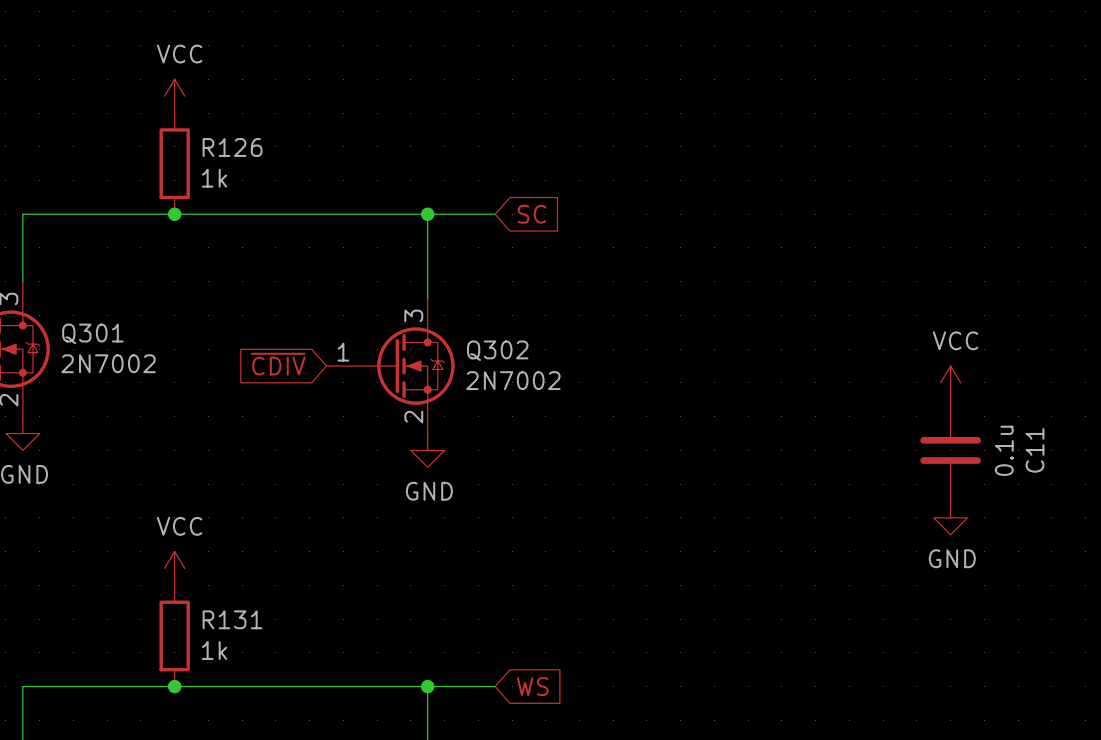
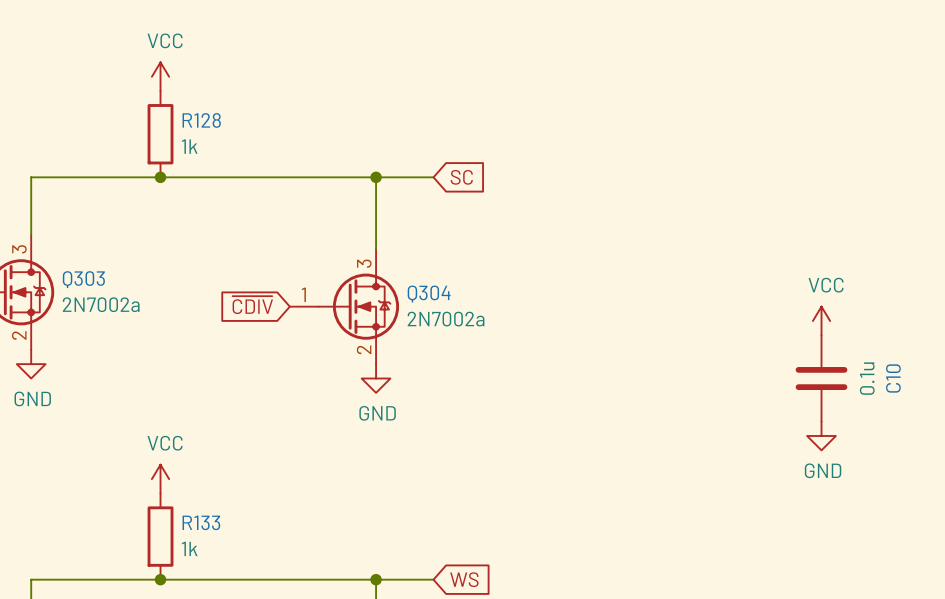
R126 name: R126 (232, 147) -> R128 (201, 120)
Q301 name: Q301 (92, 333) -> Q303 (83, 279)
Q302 name: Q302 (497, 350) -> Q304 (429, 293)
Q301 value: 2N7002 (108, 363) -> 2N7002a (101, 304)
Q302 value: 2N7002 (513, 380) -> 2N7002a (446, 319)
C11 name: C11 (1035, 450) -> C10 (893, 378)
R131 name: R131 (232, 619) -> R133 (201, 522)

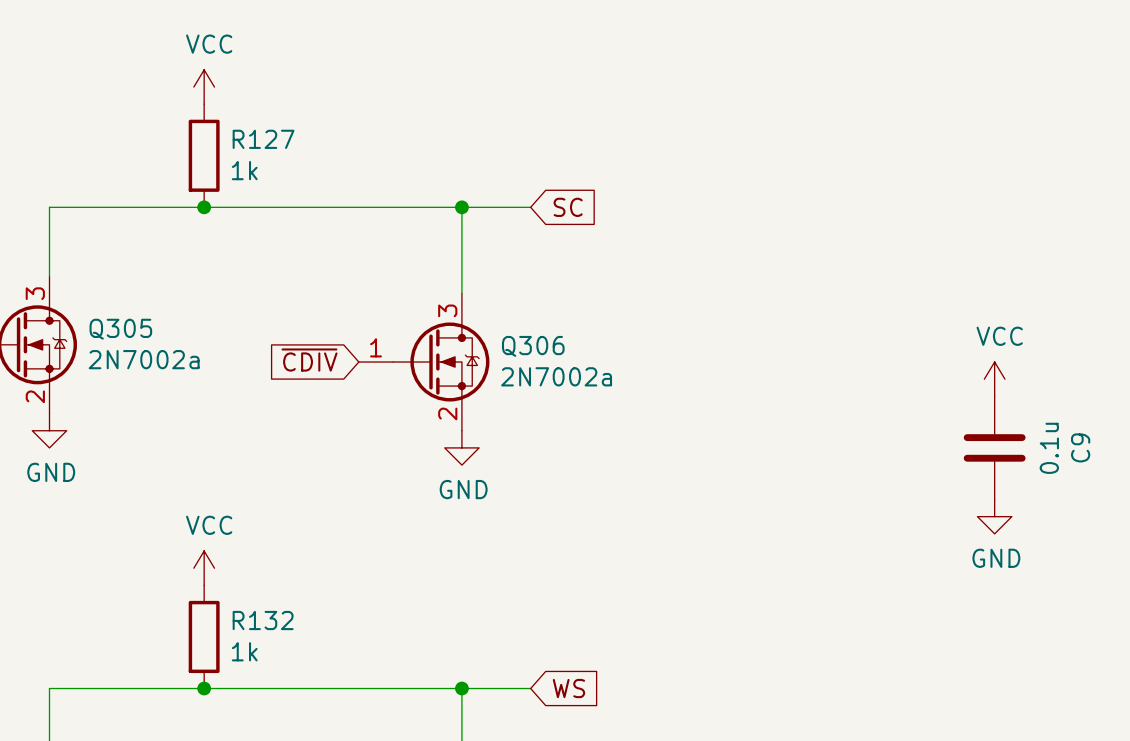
R128 name: R128 (201, 120) -> R127 (263, 139)
Q303 name: Q303 (83, 279) -> Q305 (120, 329)
Q304 name: Q304 (429, 293) -> Q306 (533, 346)
C10 name: C10 (893, 378) -> C9 (1080, 447)
R133 name: R133 (201, 522) -> R132 (263, 620)

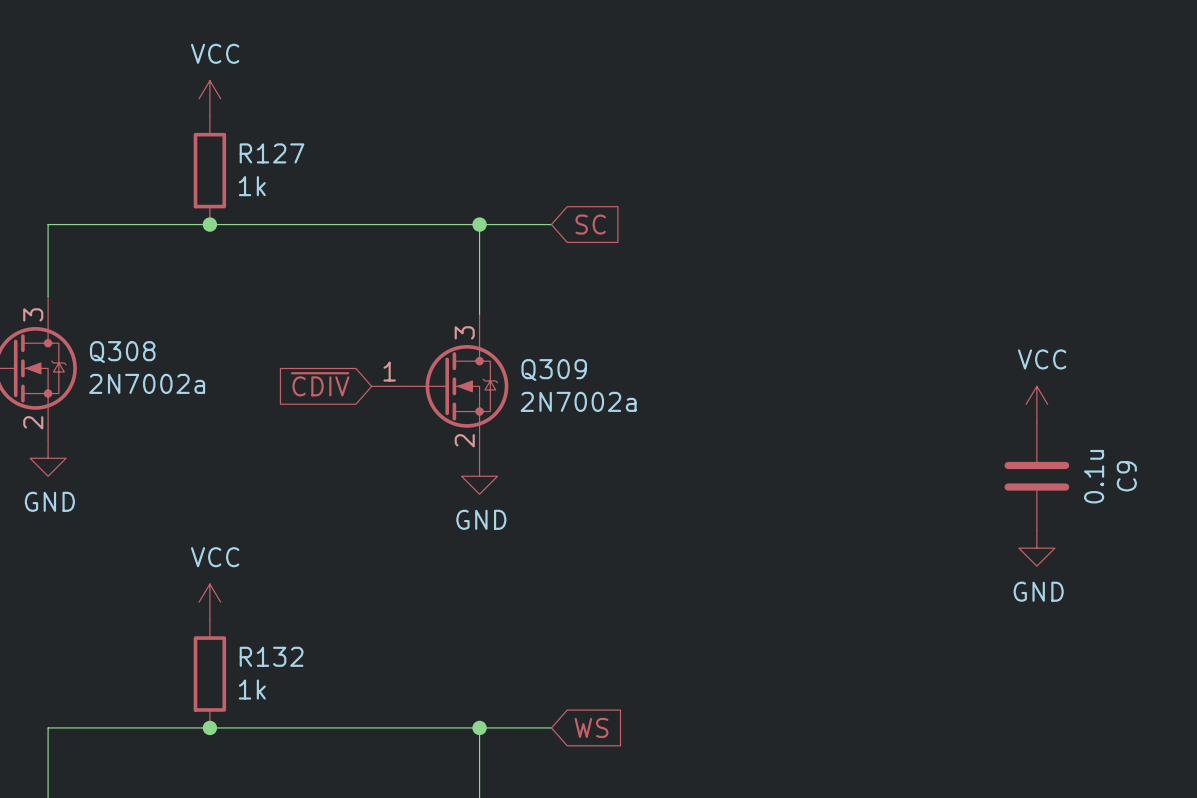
Q305 name: Q305 (120, 329) -> Q308 (122, 352)
Q306 name: Q306 (533, 346) -> Q309 (554, 370)

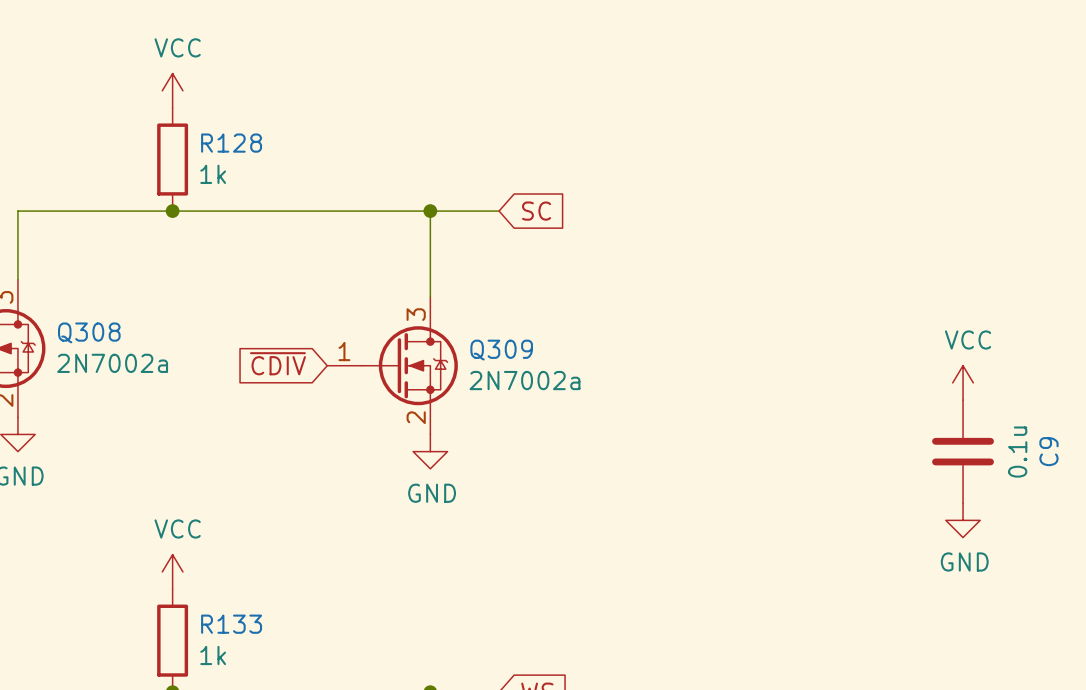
R127 name: R127 (272, 153) -> R128 (231, 143)
R132 name: R132 (271, 656) -> R133 (231, 624)

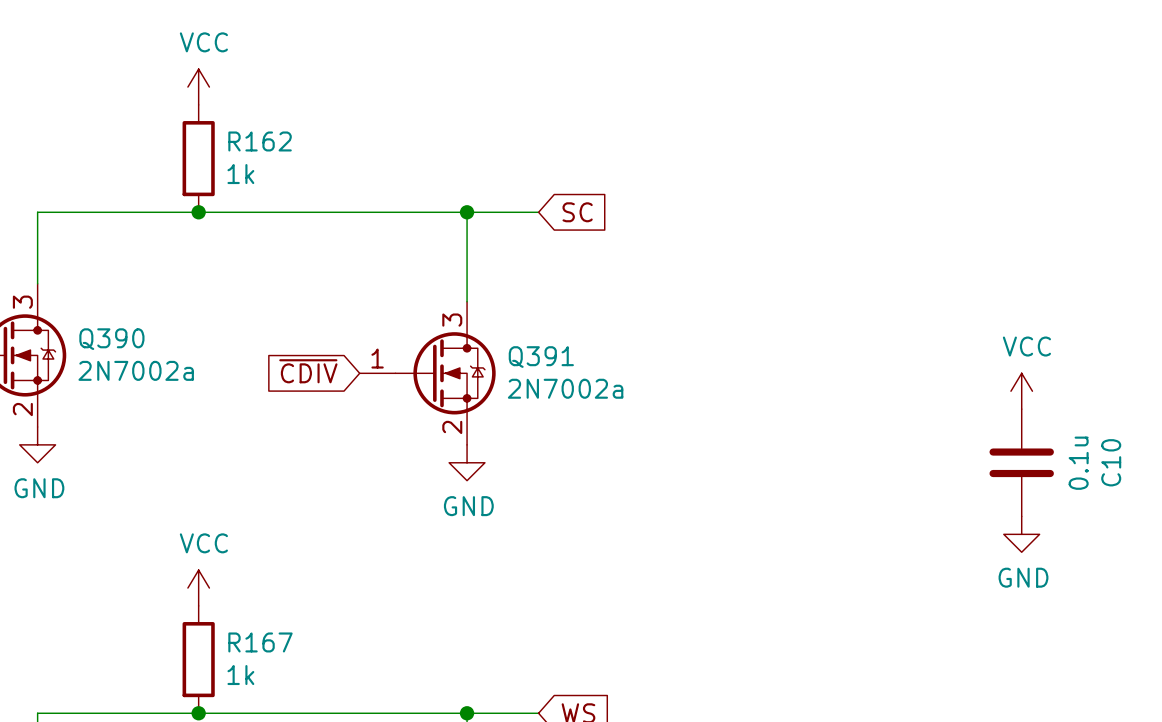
R128 name: R128 (231, 143) -> R162 (260, 141)
Q308 name: Q308 (89, 332) -> Q390 (111, 339)
Q309 name: Q309 (501, 350) -> Q391 (541, 357)
C9 name: C9 (1048, 451) -> C10 (1111, 462)
R133 name: R133 (231, 624) -> R167 (260, 642)

